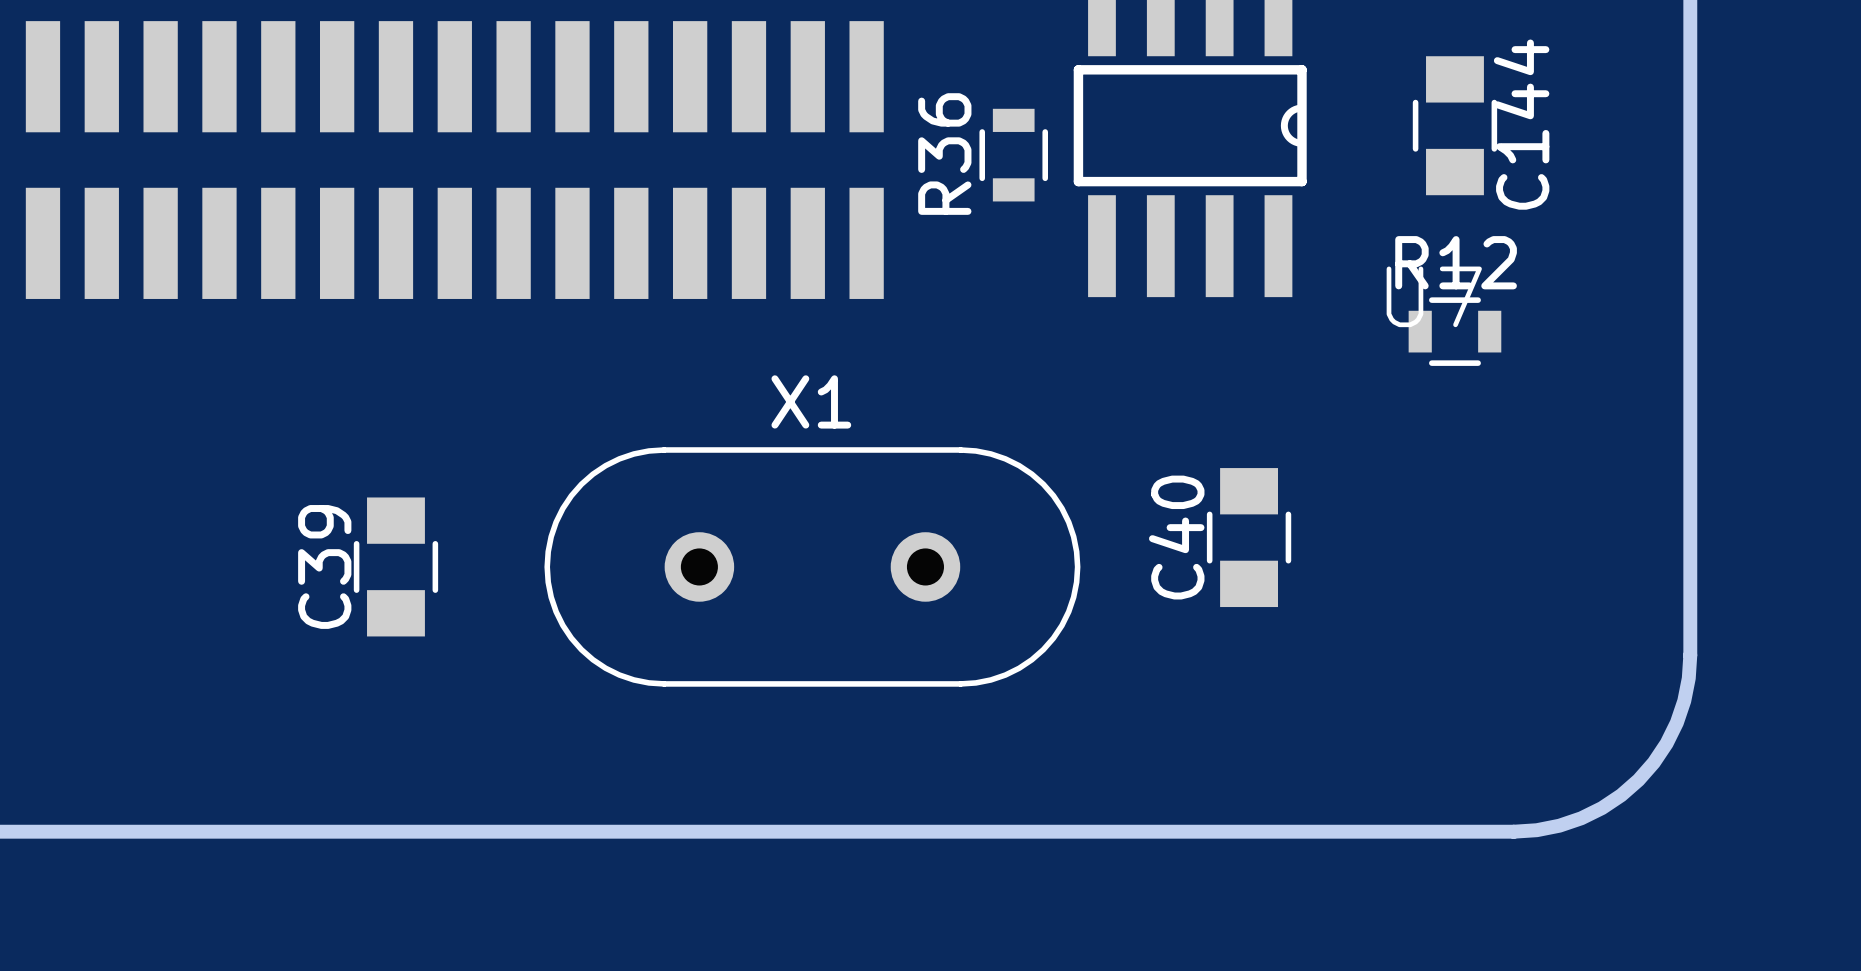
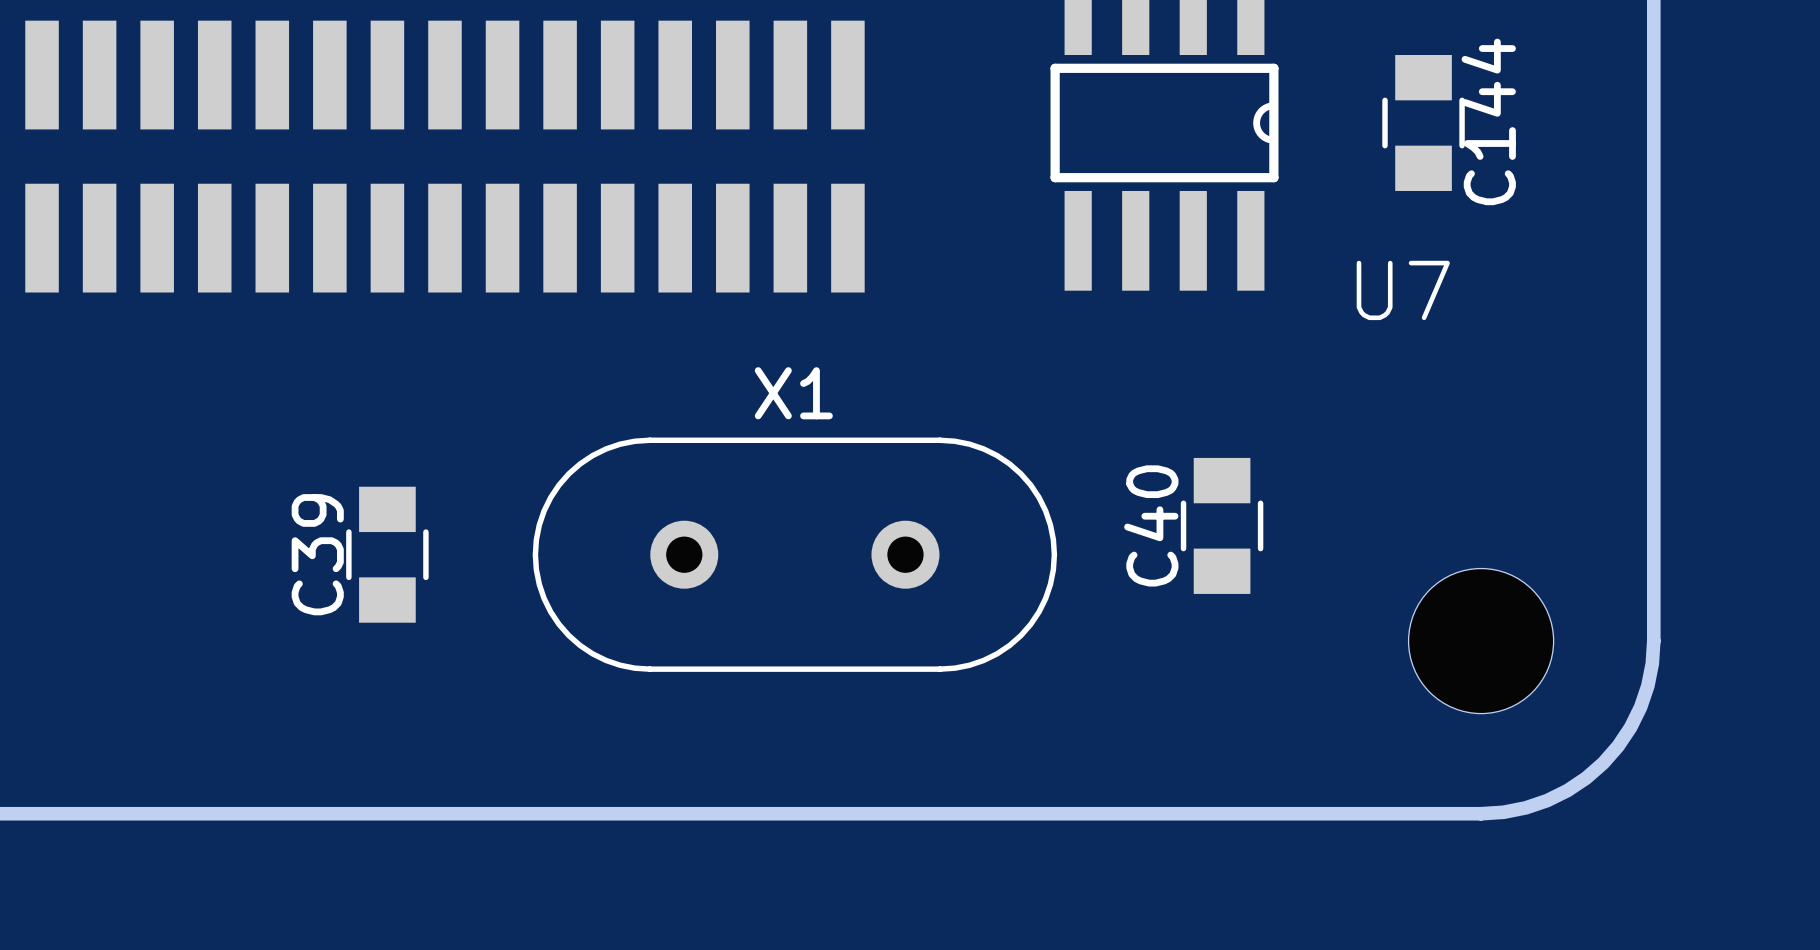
R36: (1013, 155) -> none
R12: (1454, 331) -> none
part: none -> (1481, 641)

